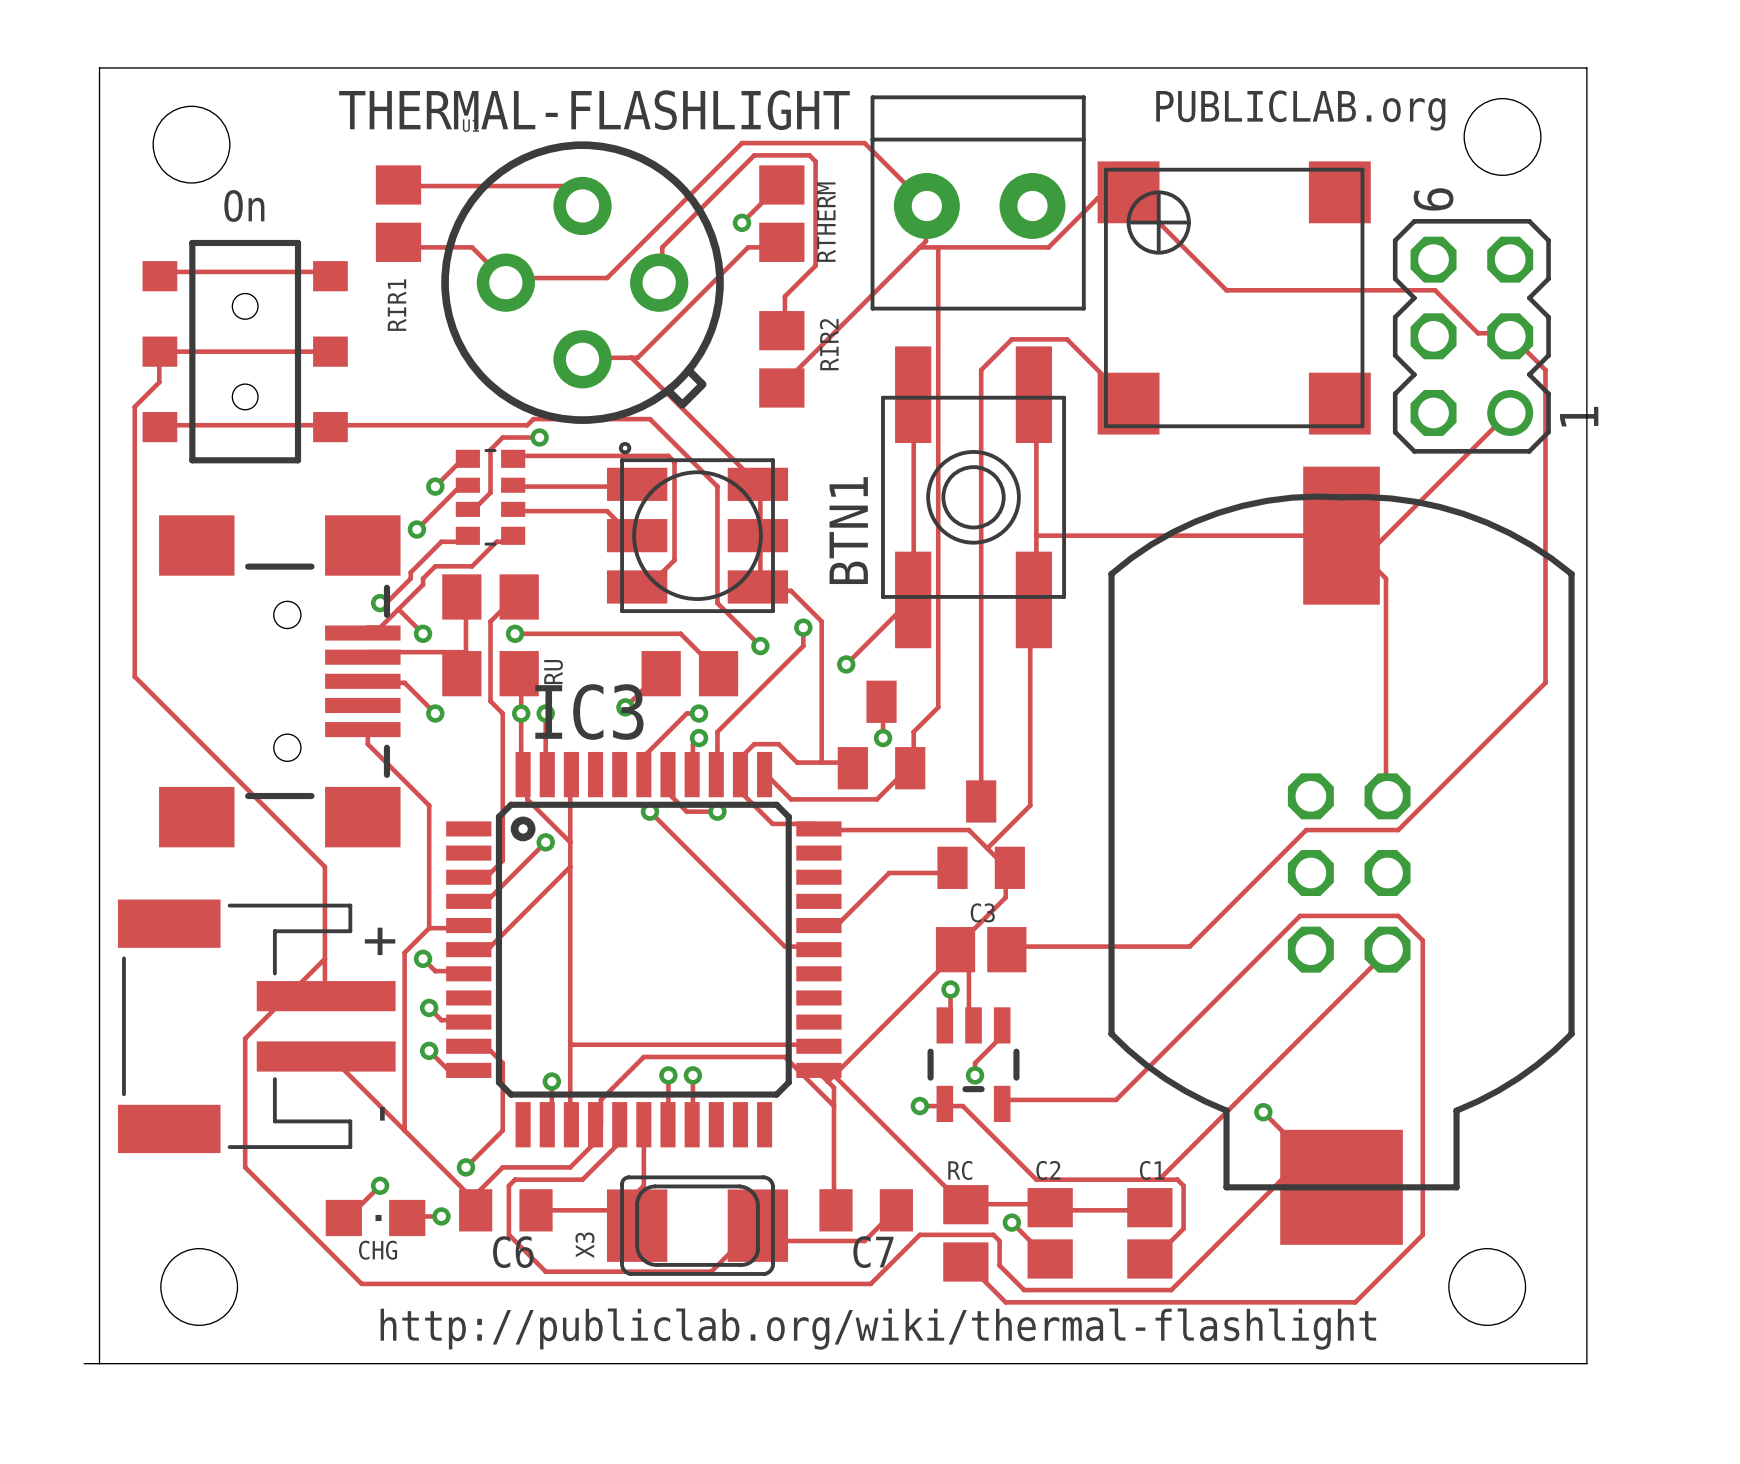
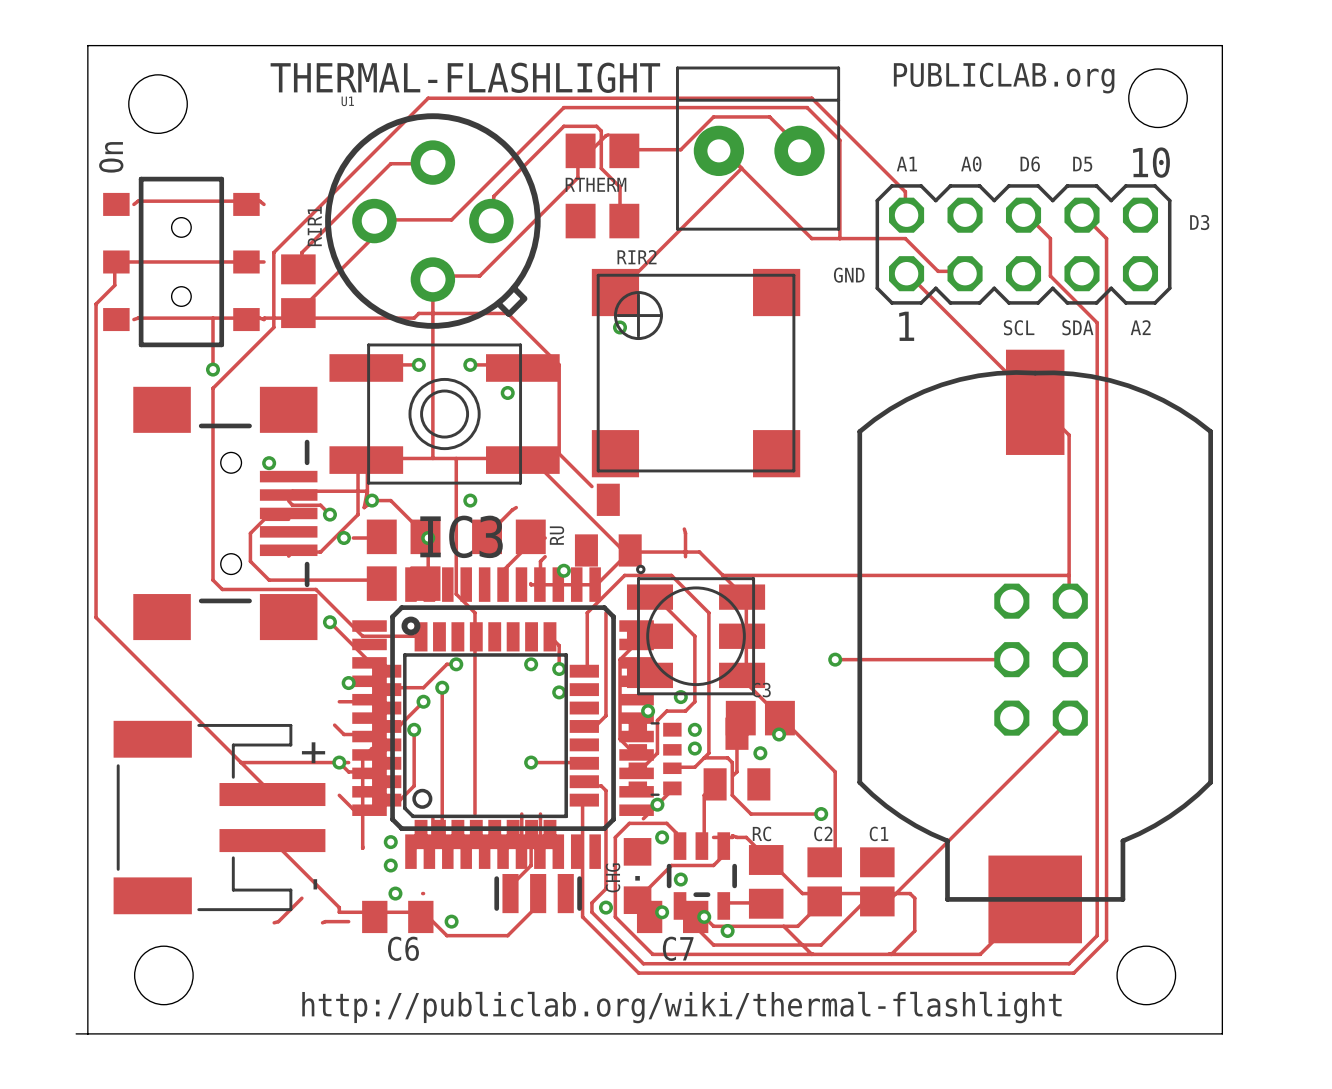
track: (398, 184) (564, 186) (582, 205) -> none
track: none -> (580, 150) (577, 154) (577, 177) (479, 276) (432, 276) (432, 458)
track: none -> (624, 150) (680, 149) (713, 116) (769, 116) (805, 150)
text rotation: 0° (244, 206) -> 90° counterclockwise (111, 157)
text position: On (244, 206) -> On (111, 157)
RIR1 position: (398, 213) -> (298, 291)
RTHERM rotation: 0° (781, 213) -> 90° clockwise (602, 150)
track: none -> (432, 162) (390, 163) (301, 252) (301, 266) (298, 269)
via: (741, 222) -> none
text: none -> A1 (906, 164)
text: none -> A0 (971, 164)
text: none -> D6 (1030, 164)
text: none -> D5 (1082, 164)
track: (398, 242) (398, 247) (472, 247) (505, 282) (508, 278) (607, 278) (741, 143) (864, 143) (925, 204) (925, 241) (784, 382) (781, 387) -> none
track: (781, 242) (778, 247) (748, 247) (637, 357) (582, 357) (582, 359) -> none
track: (919, 247) (1048, 247) (1097, 198) (1128, 198) (1128, 192) (1226, 290) (1326, 290) -> none
track: (938, 247) (938, 707) (913, 731) (913, 762) (910, 768) (876, 799) (791, 799) (764, 774) -> none
U1 position: (582, 282) -> (432, 221)
track: (659, 282) (662, 278) (662, 247) (754, 155) (809, 155) (815, 161) (815, 265) (784, 296) (784, 327) (781, 330) -> none
track: none -> (906, 215) (905, 191) (811, 98) (428, 98) (273, 252) (273, 327) (212, 388) (212, 580) (222, 589) (315, 589) (362, 636) (421, 636)
track: (1330, 290) (1402, 290) -> (1027, 215) (1050, 238) (1050, 276) (1097, 322) (1097, 711)
track: (1404, 290) (1435, 290) (1478, 333) (1508, 333) (1545, 370) (1545, 682) (1398, 830) (1306, 830) (1189, 946) (1011, 946) (1006, 949) -> (1083, 215) (1106, 238) (1106, 940) (1073, 973) (676, 973)
track: none -> (491, 221) (493, 219) (493, 196) (563, 126) (596, 126) (601, 130) (601, 168) (620, 187) (620, 219) (624, 221)
part position: (1234, 297) -> (696, 373)
text: none -> D3 (1199, 222)
track: none -> (839, 238) (839, 140) (807, 107) (563, 107) (451, 219) (374, 221) (372, 224) (372, 238) (298, 313)
part: none -> (1023, 244)
part: (1471, 336) -> none
track: (159, 351) (159, 382) (134, 406) (134, 676) (324, 866) (326, 996) -> (133, 261) (114, 261) (114, 285) (96, 304) (96, 617) (272, 794)
part position: (245, 351) -> (181, 261)
track: (631, 357) (760, 486) (760, 584) (757, 586) (760, 590) (791, 590) (821, 621) (821, 762) -> none
RIR2 rotation: 0° (781, 359) -> 90° clockwise (602, 221)
RIR2 position: (781, 359) -> (602, 221)
track: none -> (906, 273) (1036, 402)
track: none -> (965, 273) (961, 271) (938, 271) (905, 238) (811, 238) (724, 150) (741, 168) (615, 292)
text: none -> GND (849, 275)
track: (913, 394) (913, 599) (907, 603) (846, 664) -> none
track: (1033, 394) (1036, 400) (1036, 596) (1030, 603) (1030, 805) (987, 848) -> none
track: (1128, 403) (1128, 400) (1067, 339) (1011, 339) (981, 370) (981, 801) -> none
track: (1510, 412) (1367, 554) (1361, 554) (1341, 535) (1036, 535) -> none
track: none -> (212, 318) (212, 369)
track: (539, 437) (502, 437) (490, 449) (490, 492) (478, 504) (472, 504) (467, 509) -> none
via: (539, 437) -> none
via: none -> (620, 327)
text: none -> SCL (1019, 327)
text: none -> SDA (1077, 327)
text: none -> A2 (1140, 327)
track: (467, 458) (465, 462) (459, 462) (435, 486) -> none
track: (513, 458) (515, 455) (668, 455) (674, 462) (674, 560) (649, 584) (637, 584) (637, 586) -> none
track: (467, 485) (459, 486) (416, 529) -> none
via: (435, 486) -> none
track: (533, 486) (600, 486) -> none
via: none -> (418, 364)
via: none -> (470, 364)
via: none -> (212, 369)
part position: (490, 497) -> (655, 759)
BTN1: (973, 497) -> none
track: (513, 509) (515, 511) (607, 511) (631, 535) (637, 535) -> none
via: none -> (507, 392)
part position: (697, 527) -> (696, 630)
via: (416, 529) -> none
track: (467, 535) (465, 541) (441, 541) (410, 572) (410, 578) (386, 603) (380, 603) -> none
track: (513, 535) (508, 541) (496, 541) (472, 566) (435, 566) (423, 578) (423, 584) (380, 627) (367, 627) (362, 633) -> none
part: none -> (444, 414)
part: (490, 596) -> none
track: (519, 596) (515, 596) (490, 621) (490, 701) (502, 713) (502, 860) (490, 872) (472, 872) (468, 877) -> none
via: (380, 603) -> none
track: (398, 609) (423, 633) -> none
track: none -> (456, 458) (456, 594) (474, 612) (476, 636) (474, 814)
via: none -> (269, 463)
track: (803, 627) (803, 646) (717, 731) (716, 774) -> none
via: (803, 627) -> none
via: (423, 633) -> none
track: (515, 633) (680, 633) (718, 673) -> none
via: (515, 633) -> none
via: (760, 646) -> none
track: none -> (288, 500) (292, 505) (320, 505) (329, 514)
track: none -> (372, 500) (390, 500) (425, 536)
via: none -> (372, 500)
via: none -> (470, 500)
via: (846, 664) -> none
RU position: (490, 673) -> (508, 536)
track: (519, 673) (521, 676) (521, 768) (523, 774) (527, 774) (527, 799) (570, 842) -> none
part: (689, 673) -> none
track: (362, 681) (404, 682) (435, 713) -> none
via: none -> (329, 514)
track: none -> (288, 519) (264, 519) (250, 533) (250, 561) (269, 580) (381, 580) (381, 583)
via: (625, 707) -> none
track: none -> (381, 536) (353, 538)
part: none -> (403, 536)
via: (521, 713) -> none
via: (699, 713) -> none
track: (362, 729) (367, 731) (367, 744) (429, 805) (429, 928) (404, 952) (404, 1130) -> none
track: none -> (630, 550) (699, 552) (741, 594) (742, 597) (746, 598) (746, 673) (742, 675) (741, 678) (835, 771) (835, 860) (824, 862)
track: none -> (630, 550) (596, 584) (530, 583)
track: none -> (630, 550) (629, 547) (620, 547) (535, 463) (526, 463) (521, 458) (367, 458) (358, 467) (358, 514) (320, 552) (292, 552) (288, 556)
part position: (881, 734) -> (608, 525)
via: (699, 738) -> none
via: (883, 738) -> none
via: none -> (563, 570)
track: (803, 762) (797, 762) (778, 744) (754, 744) (741, 756) (740, 774) (741, 774) (741, 793) (772, 823) (815, 823) (821, 830) (968, 830) (1005, 866) (1009, 867) (1005, 872) (1005, 897) (956, 946) (956, 952) -> (624, 575) (587, 612) (587, 669) (584, 671)
track: none -> (722, 575) (1069, 575)
part: none -> (403, 583)
track: (571, 774) (571, 1124) -> none
track: (668, 774) (668, 793) (686, 811) (717, 811) -> none
track: none -> (649, 597) (652, 594) (694, 636) (694, 701) (685, 711) (666, 711) (657, 720) (657, 753) (643, 767) (637, 768)
track: (649, 811) (784, 946) (815, 946) (818, 949) -> none
via: (649, 811) -> none
via: (717, 811) -> none
track: none -> (605, 612) (605, 715) (596, 725) (584, 726)
track: none -> (329, 622) (376, 669) (386, 669) (386, 671)
via: none -> (329, 622)
part: (981, 834) -> none
track: (545, 842) (490, 897) (472, 897) (468, 901) -> none
via: (545, 842) -> none
track: none -> (649, 636) (643, 636) (620, 659) (620, 739) (629, 748) (637, 749)
track: none -> (549, 636) (559, 645) (559, 669)
track: (570, 866) (490, 946) (472, 946) (468, 949) -> none
track: (952, 867) (950, 872) (889, 872) (840, 922) (821, 922) (818, 925) -> none
track: none -> (835, 659) (1011, 659)
via: none -> (835, 659)
track: none -> (456, 664) (446, 664) (423, 687) (390, 687) (386, 689)
via: none -> (456, 664)
via: none -> (531, 664)
via: none -> (559, 669)
via: none -> (348, 683)
track: none -> (442, 687) (442, 832) (439, 834)
via: none -> (442, 687)
via: none -> (559, 692)
via: none -> (680, 697)
track: none -> (423, 701) (400, 725) (386, 726)
via: none -> (423, 701)
via: none -> (648, 711)
track: (1422, 940) (1398, 915) (1300, 915) (1116, 1099) (1005, 1099) (1002, 1103) -> none
track: (956, 952) (913, 995) -> (662, 575) (671, 575) (708, 612) (708, 753)
track: (956, 952) (968, 964) (968, 1020) (973, 1025) -> none
track: (324, 958) (245, 1038) (245, 1167) (361, 1283) (821, 1283) -> (584, 800) (582, 804) (582, 916) (638, 973)
via: (423, 958) -> none
track: none -> (414, 729) (414, 785) (400, 799) (386, 800)
via: none -> (414, 729)
via: none -> (694, 729)
via: none -> (779, 734)
part: none -> (485, 735)
track: none -> (386, 744) (386, 748) (372, 748) (362, 757) (362, 848)
via: none -> (694, 748)
via: (950, 989) -> none
via: none -> (760, 753)
track: none -> (704, 757) (727, 757) (732, 762) (732, 795) (751, 814) (821, 814)
part: none -> (736, 759)
track: none -> (241, 762) (348, 762)
track: none -> (531, 762) (584, 763)
via: none -> (531, 762)
track: (895, 1014) (864, 1044) -> (694, 767) (672, 768)
track: (1002, 1025) (999, 1026) (999, 1038) (975, 1063) (975, 1075) -> none
part position: (256, 1026) -> (219, 817)
track: none -> (715, 784) (704, 795) (704, 842) (701, 846)
track: (570, 1044) (815, 1044) (818, 1046) -> none
track: (468, 1046) (472, 1050) (490, 1050) (502, 1063) (502, 1130) (465, 1167) -> none
via: (429, 1050) -> none
track: (326, 1056) (331, 1056) (472, 1198) (502, 1167) (570, 1167) (594, 1142) (595, 1124) (600, 1124) (600, 1099) (643, 1056) (784, 1056) (833, 1106) -> none
via: none -> (657, 804)
part position: (973, 1064) -> (701, 876)
via: (668, 1075) -> none
via: (692, 1075) -> none
via: (975, 1075) -> none
via: none -> (821, 814)
via: (551, 1081) -> none
track: none -> (531, 834) (531, 865) (512, 884) (512, 893) (510, 893)
via: none -> (662, 837)
via: (919, 1106) -> none
track: none -> (272, 840) (339, 907) (339, 912) (423, 912) (446, 935) (507, 935) (535, 907) (535, 893) (538, 893)
via: none -> (390, 842)
track: (1263, 1112) (1336, 1185) (1341, 1187) (1306, 1155) (1171, 1290) (1024, 1290) (999, 1265) (999, 1240) (993, 1234) (919, 1234) (870, 1283) -> none
via: (1263, 1112) -> none
track: none -> (680, 846) (676, 842) (676, 832) (666, 823) (629, 823) (615, 837) (615, 916) (652, 954) (980, 954) (1035, 899)
track: none -> (723, 846) (722, 856) (713, 865) (671, 865) (637, 900)
track: (619, 1124) (619, 1142) (582, 1179) (539, 1179) -> none
track: (643, 1124) (643, 1185) (619, 1210) -> none
via: none -> (390, 865)
via: none -> (680, 879)
via: (465, 1167) -> none
via: none -> (395, 893)
track: (538, 1179) (515, 1179) (508, 1185) (508, 1234) (545, 1271) (711, 1271) (757, 1225) (772, 1240) (864, 1240) (896, 1210) -> none
part: none -> (538, 893)
track: none -> (896, 893) (891, 898) (877, 898) (877, 902) (863, 902) (821, 945) (713, 945) (676, 907) (680, 905)
via: (380, 1185) -> none
track: none -> (824, 901) (797, 926) (713, 926) (704, 916)
track: none -> (766, 903) (727, 902) (723, 905)
via: none -> (605, 907)
via: none -> (662, 912)
track: (1149, 1207) (1146, 1210) (1054, 1210) (1048, 1204) (962, 1204) (833, 1075) (818, 1070) (833, 1087) (833, 1210) (836, 1210) -> none
track: (536, 1210) (619, 1210) -> none
via: none -> (704, 916)
via: (441, 1216) -> none
via: none -> (451, 921)
CHG rotation: 0° (375, 1217) -> 90° clockwise (637, 876)
CHG position: (375, 1217) -> (637, 876)
via: (1011, 1222) -> none
X3: (697, 1225) -> none
via: none -> (727, 930)
RC position: (965, 1233) -> (766, 881)
C2 position: (1050, 1233) -> (824, 881)
C1 position: (1149, 1233) -> (877, 881)
track: (965, 1262) (1005, 1302) (1355, 1302) (1386, 1271) -> (584, 781) (587, 785) (601, 785) (605, 790) (605, 888) (591, 902) (591, 912) (643, 963) (1069, 963)

